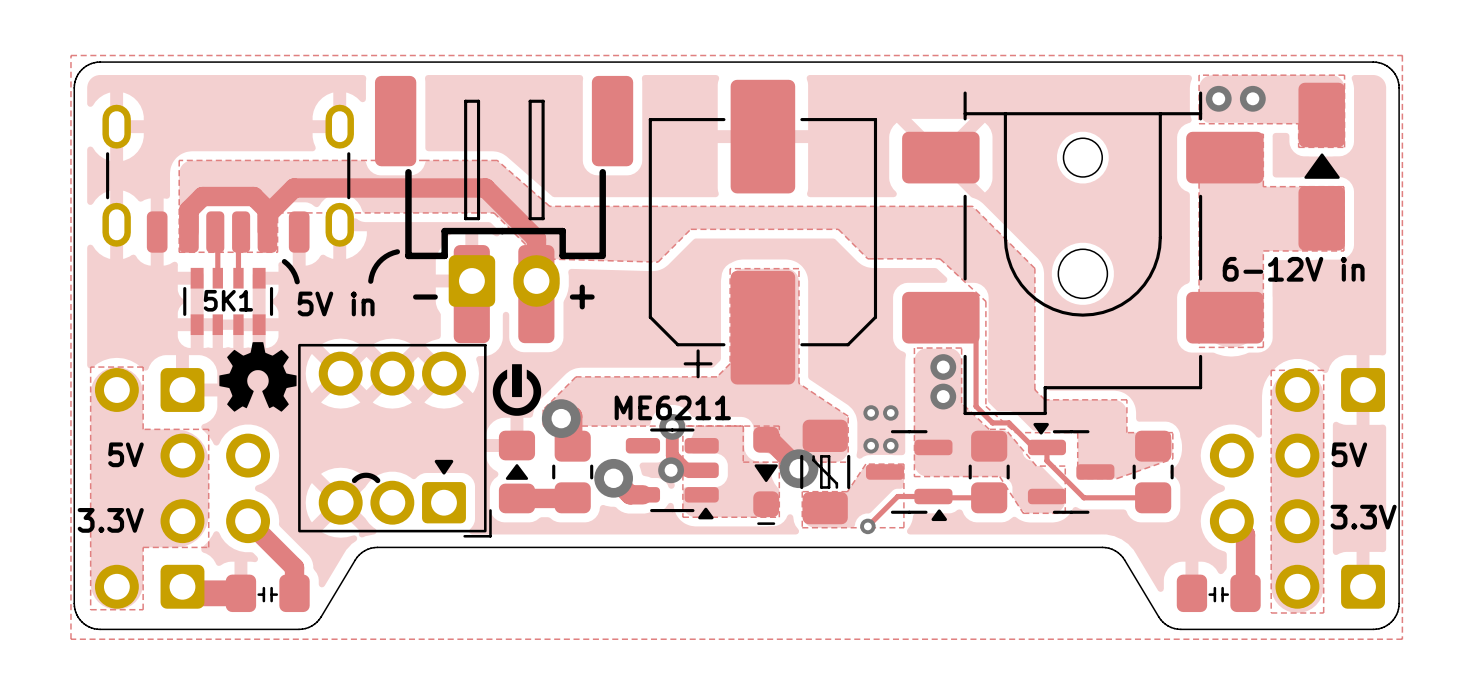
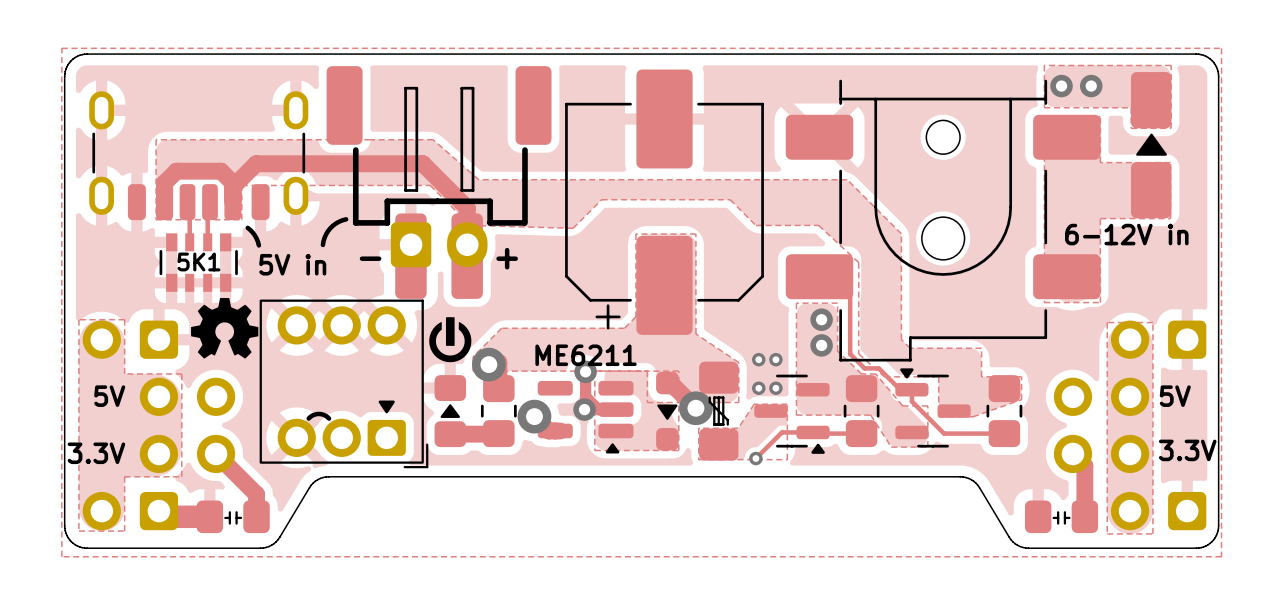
part footprint: [800, 419, 851, 525] -> [699, 361, 739, 461]
part footprint: [753, 426, 780, 525] -> [656, 371, 679, 451]
part footprint: [625, 428, 719, 520] -> [537, 380, 634, 454]

